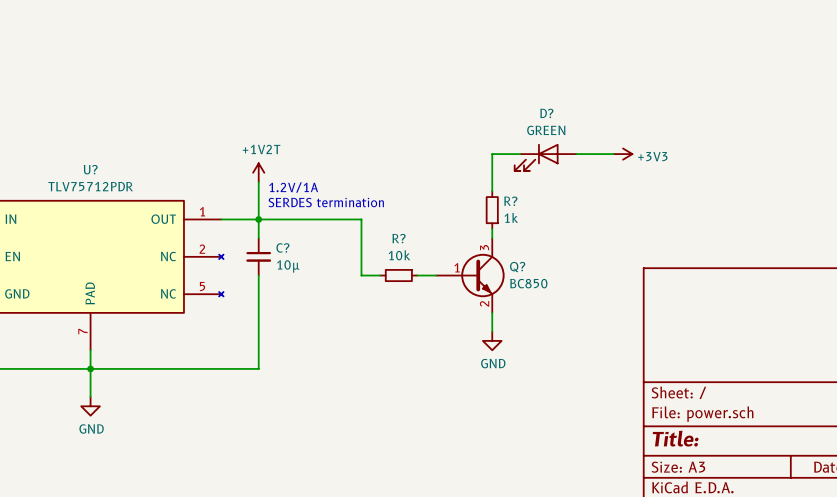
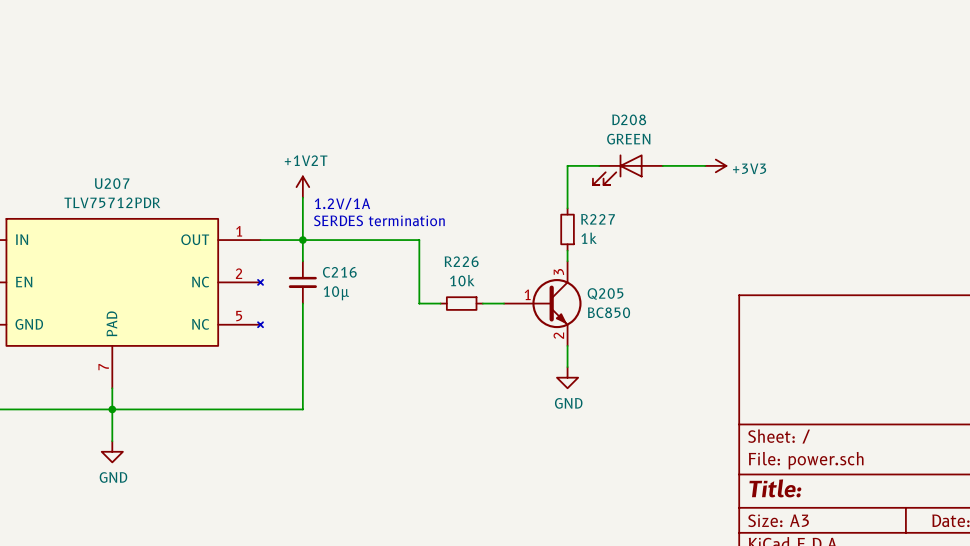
D? name: D? (546, 113) -> D208 (629, 119)
U? name: U? (90, 169) -> U207 (112, 183)
R? name: R? (510, 201) -> R227 (598, 219)
R? name: R? (399, 238) -> R226 (461, 261)
C? name: C? (282, 247) -> C216 (339, 272)
Q? name: Q? (517, 267) -> Q205 (605, 293)

